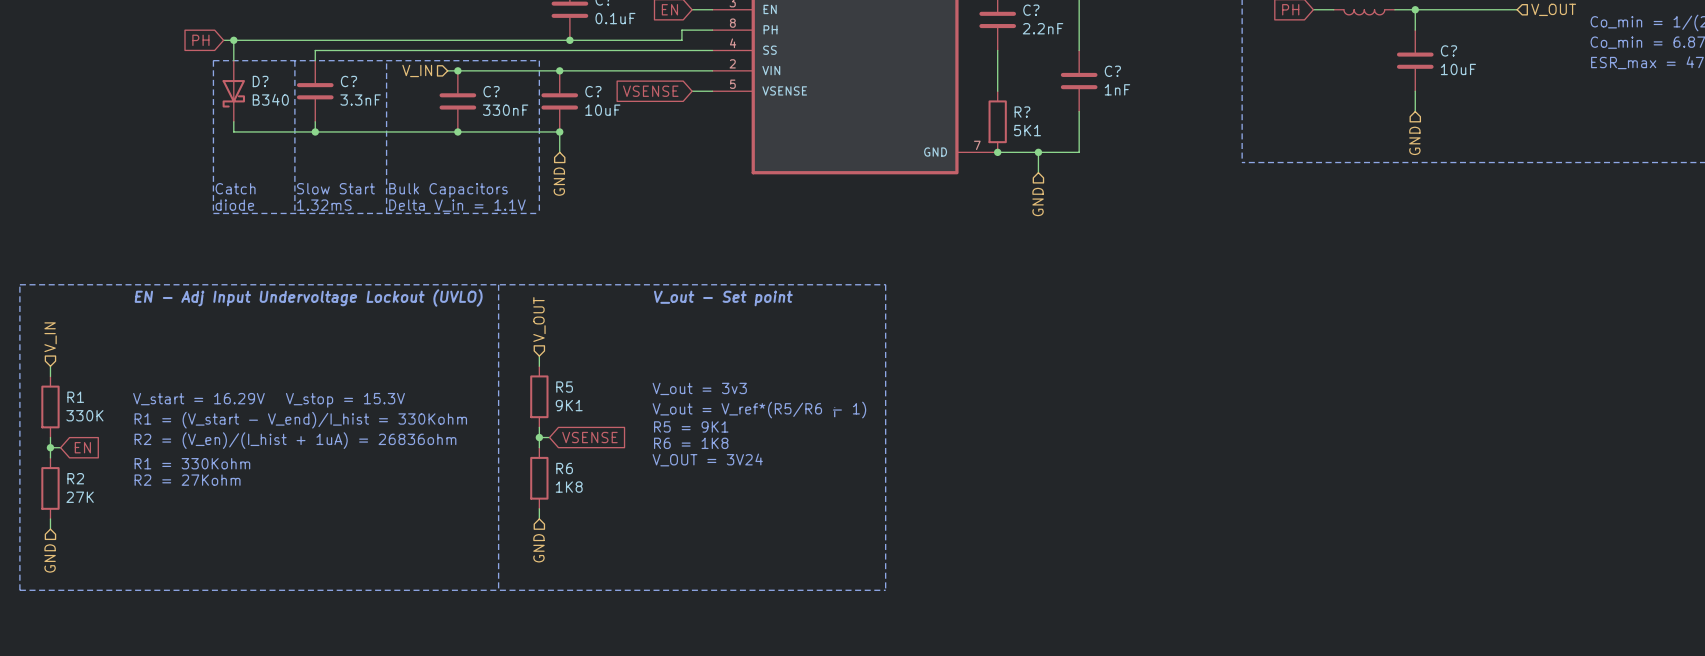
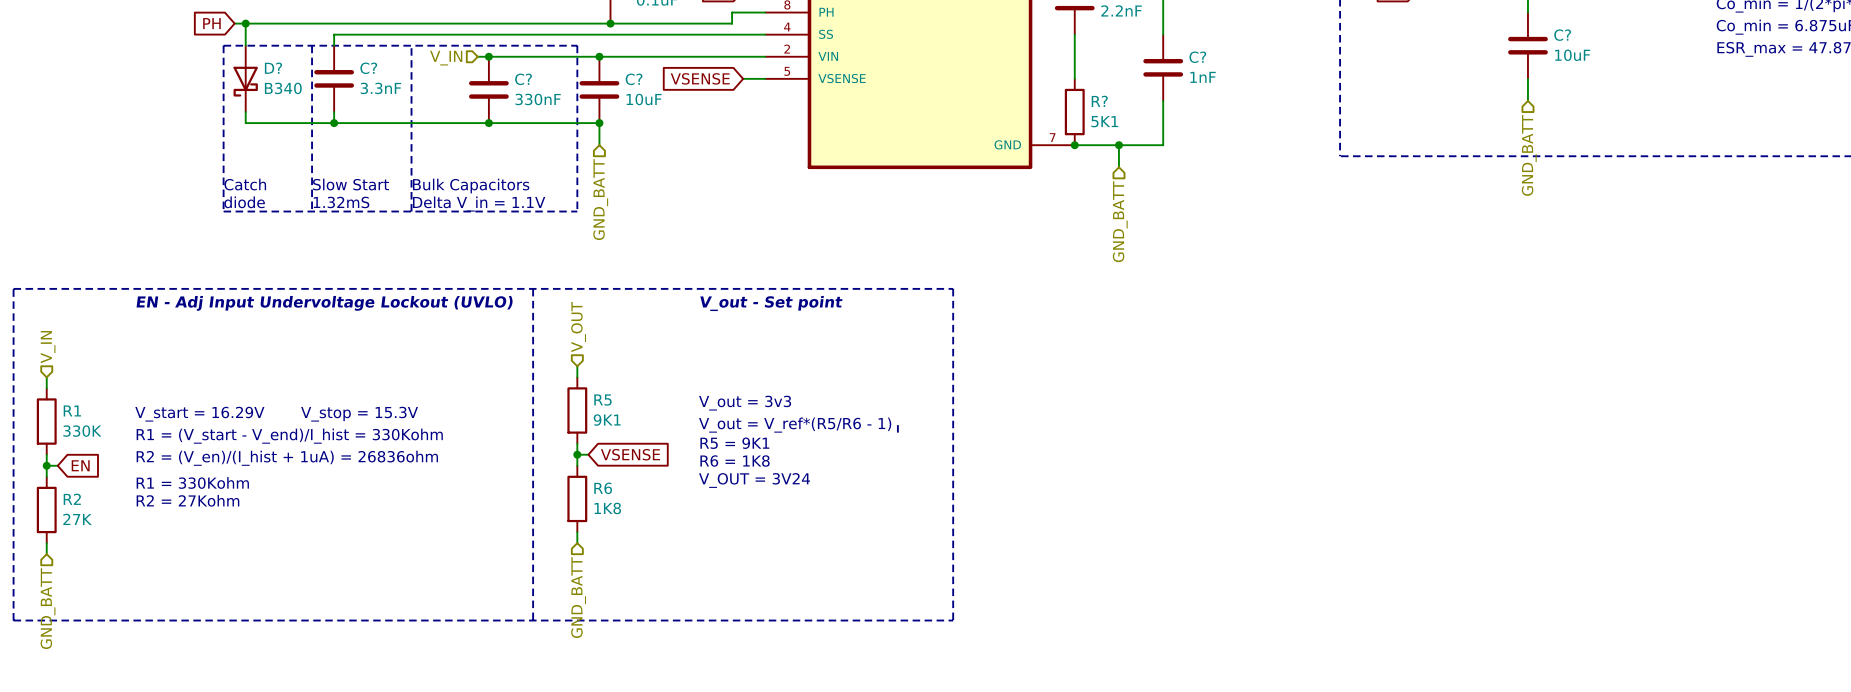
hierarchical label: GND (1414, 140) -> GND_BATT (1529, 155)
hierarchical label: GND (559, 181) -> GND_BATT (600, 199)
hierarchical label: GND (1038, 201) -> GND_BATT (1120, 221)
hierarchical label: GND (538, 548) -> GND_BATT (578, 597)
hierarchical label: GND (50, 558) -> GND_BATT (48, 608)

